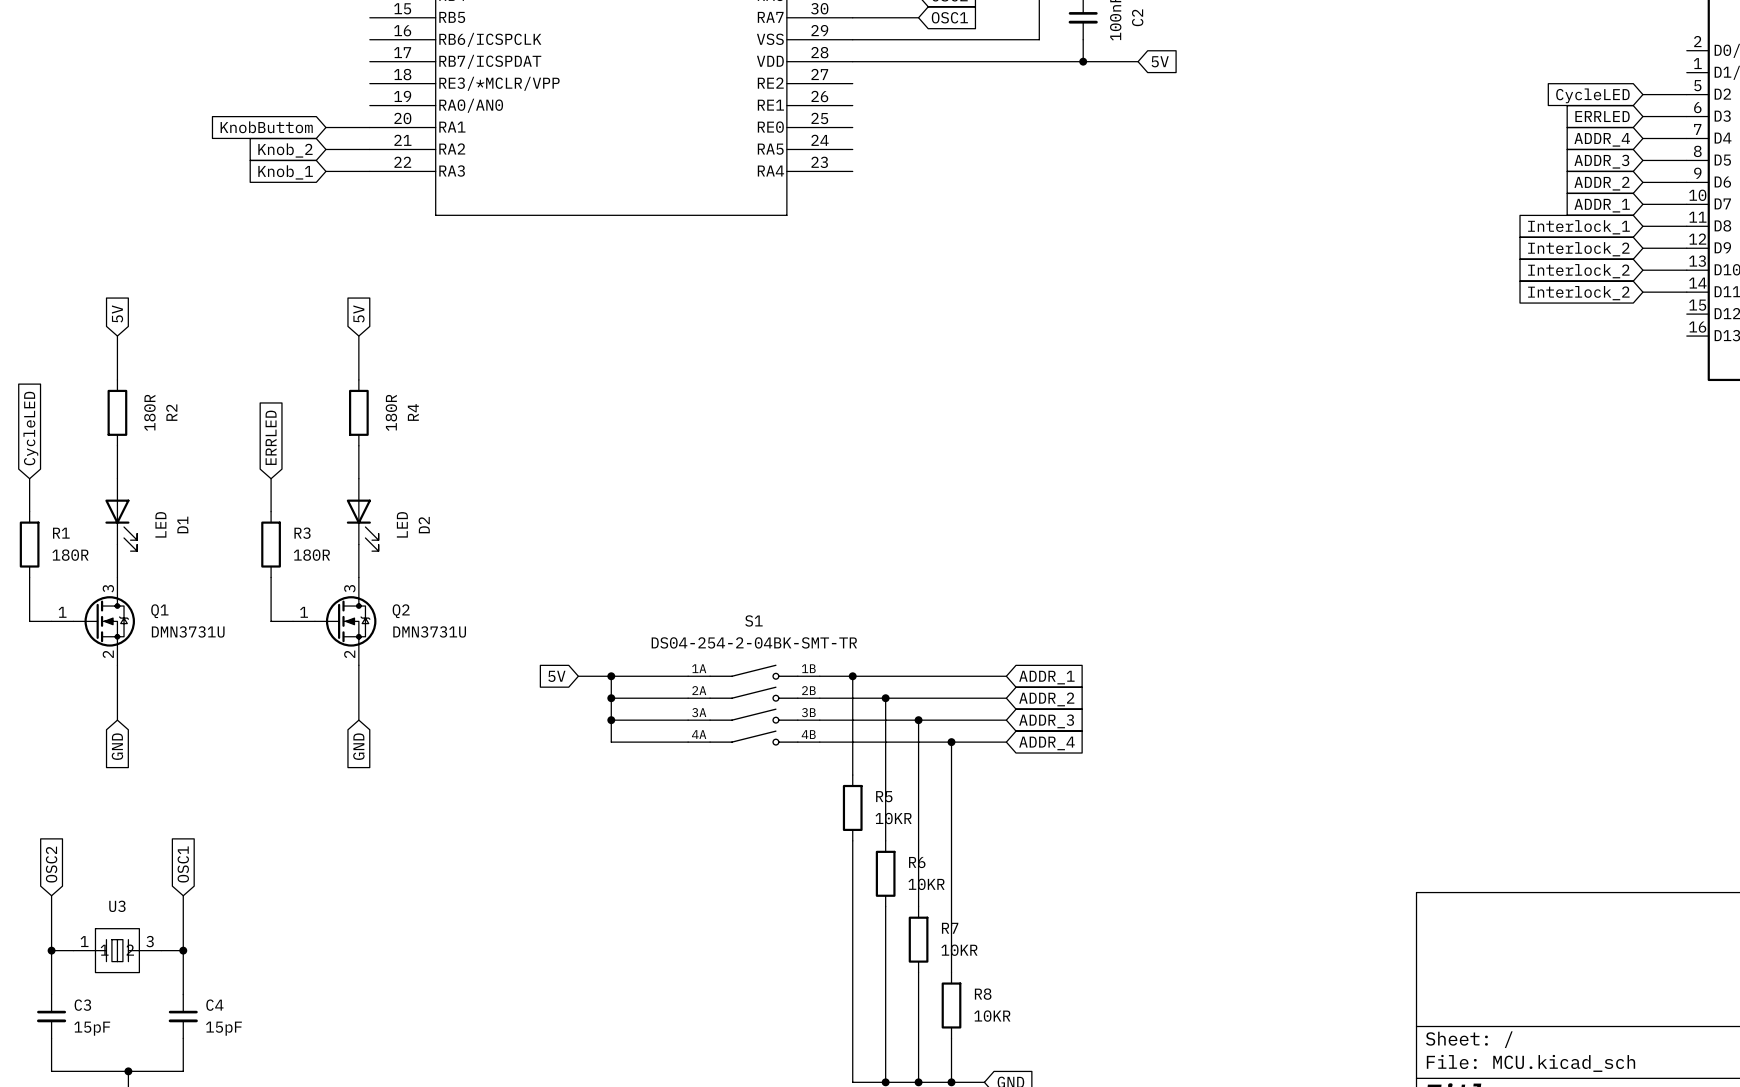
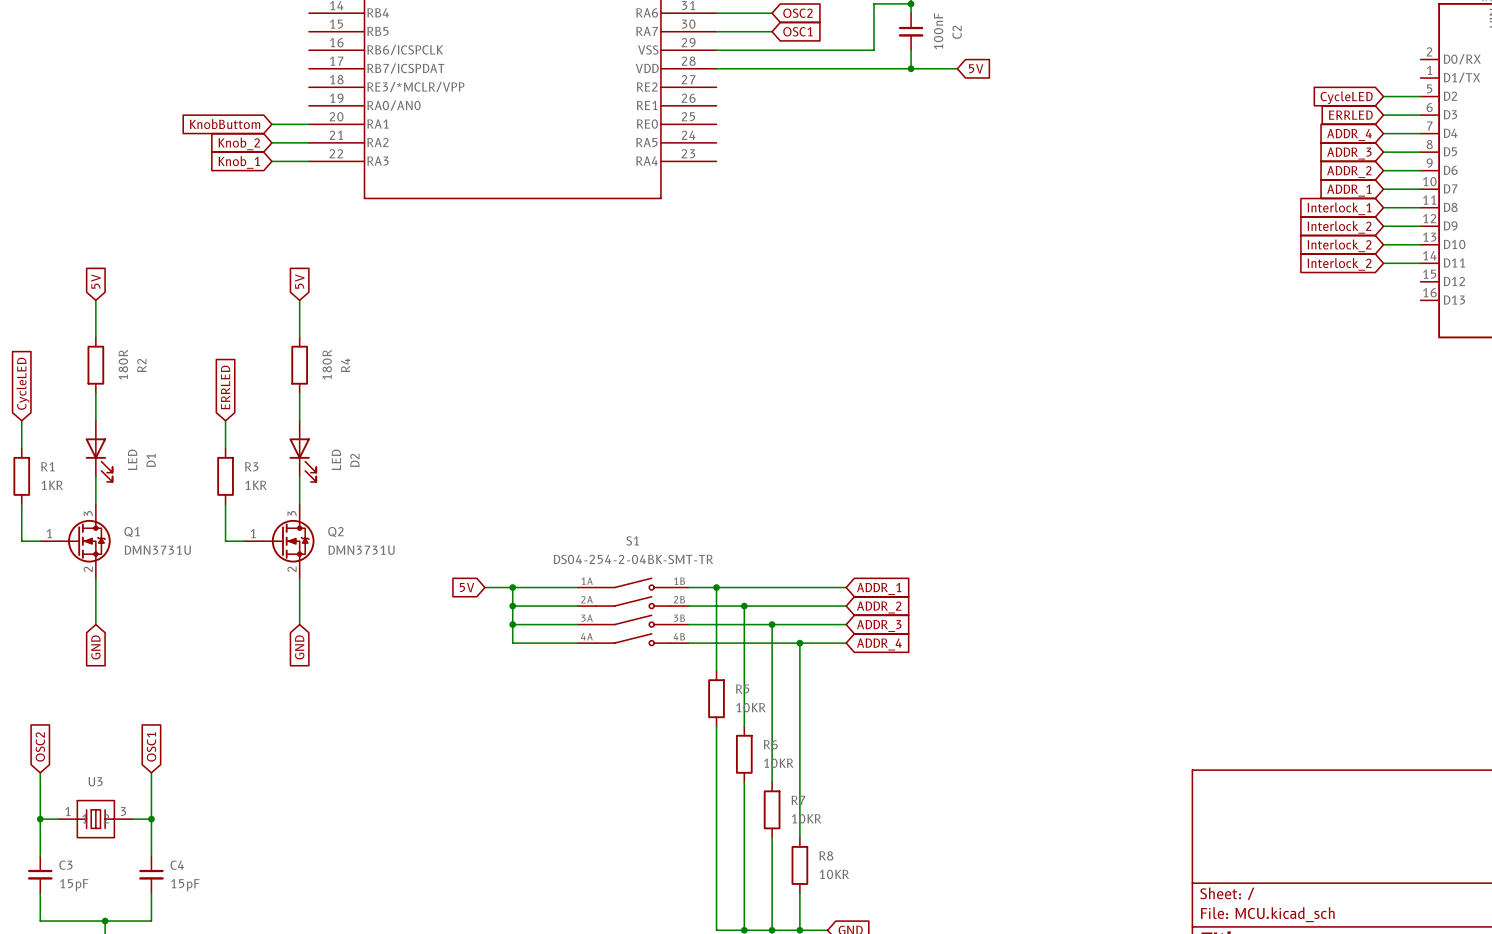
R1 value: 180R (70, 555) -> 1KR (52, 485)
R3 value: 180R (311, 555) -> 1KR (256, 485)

